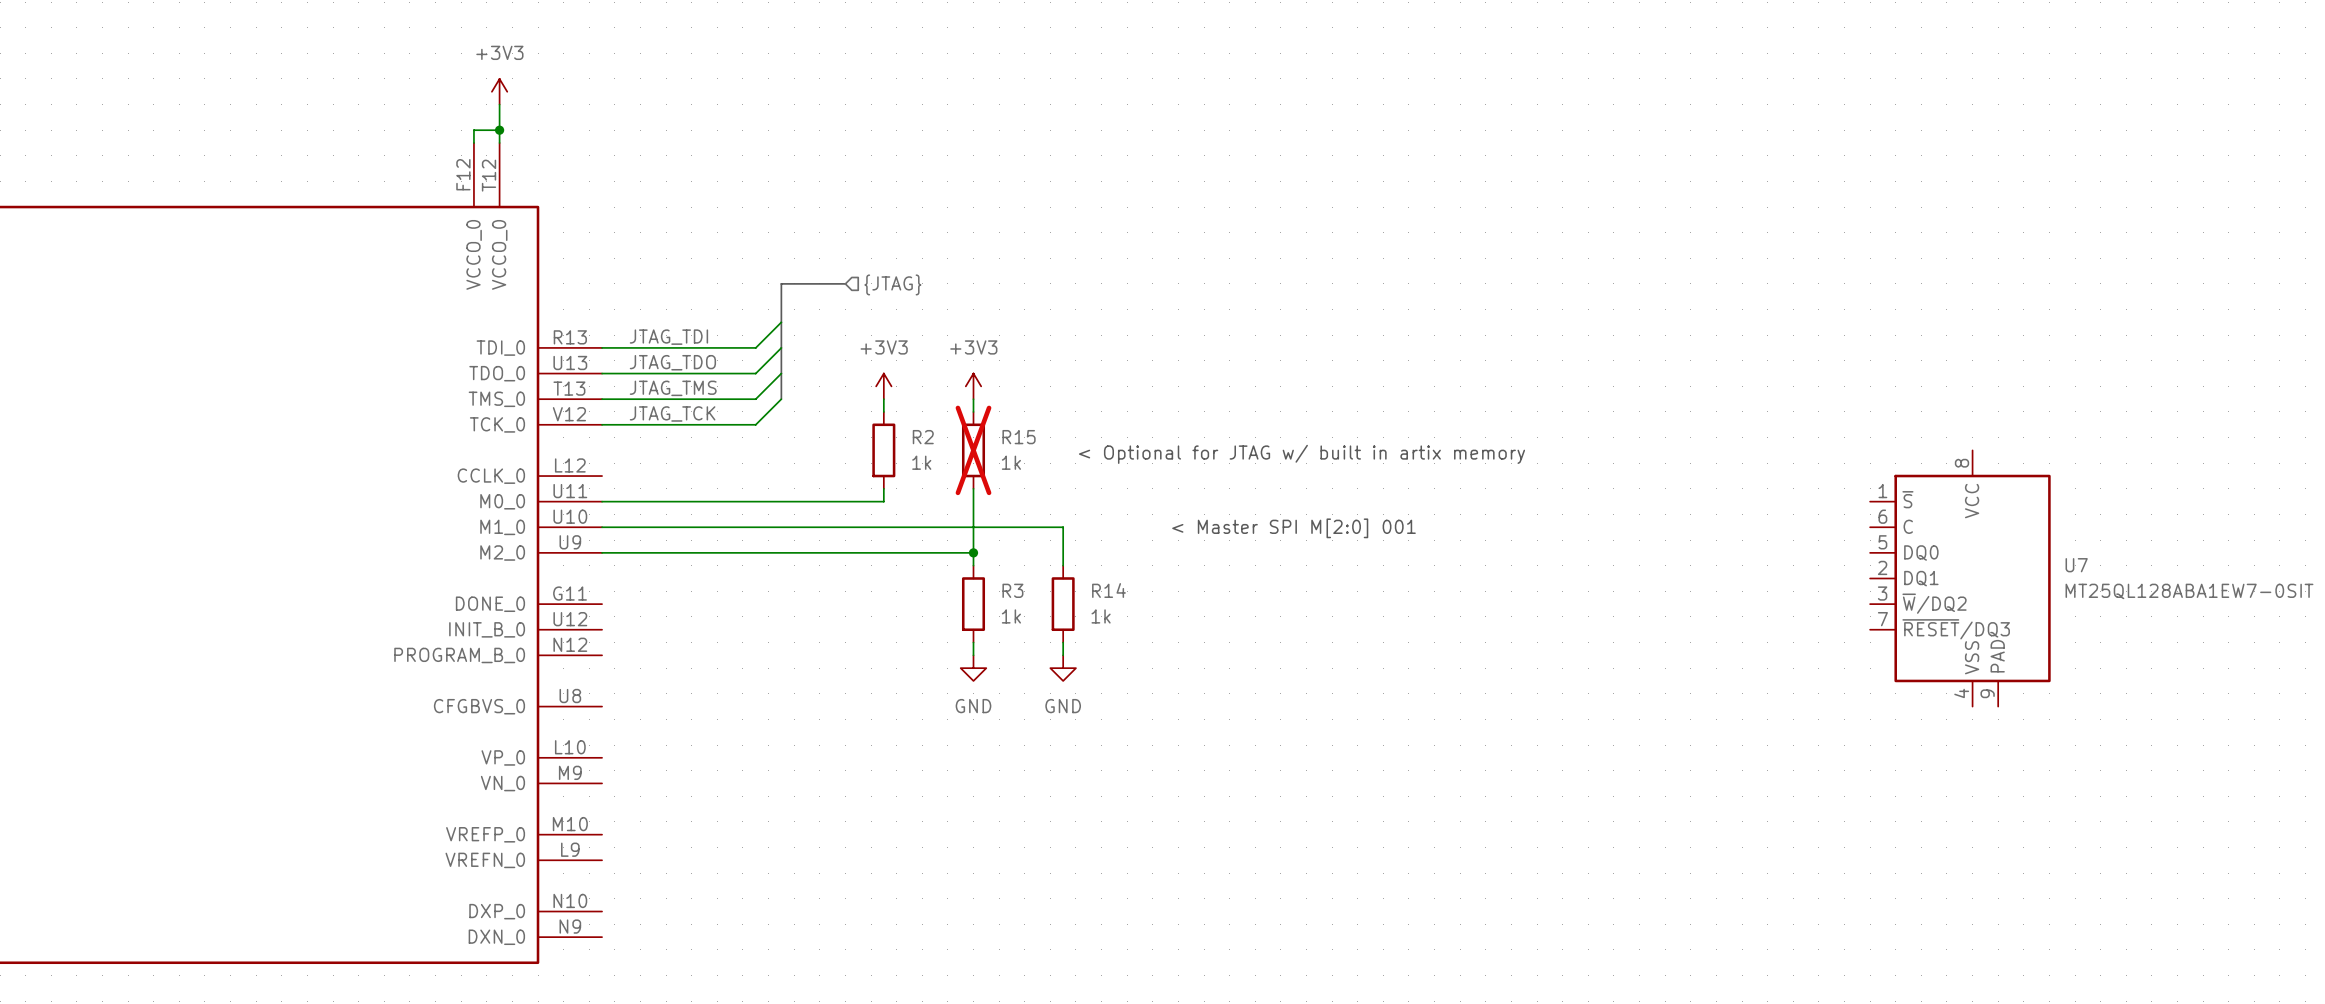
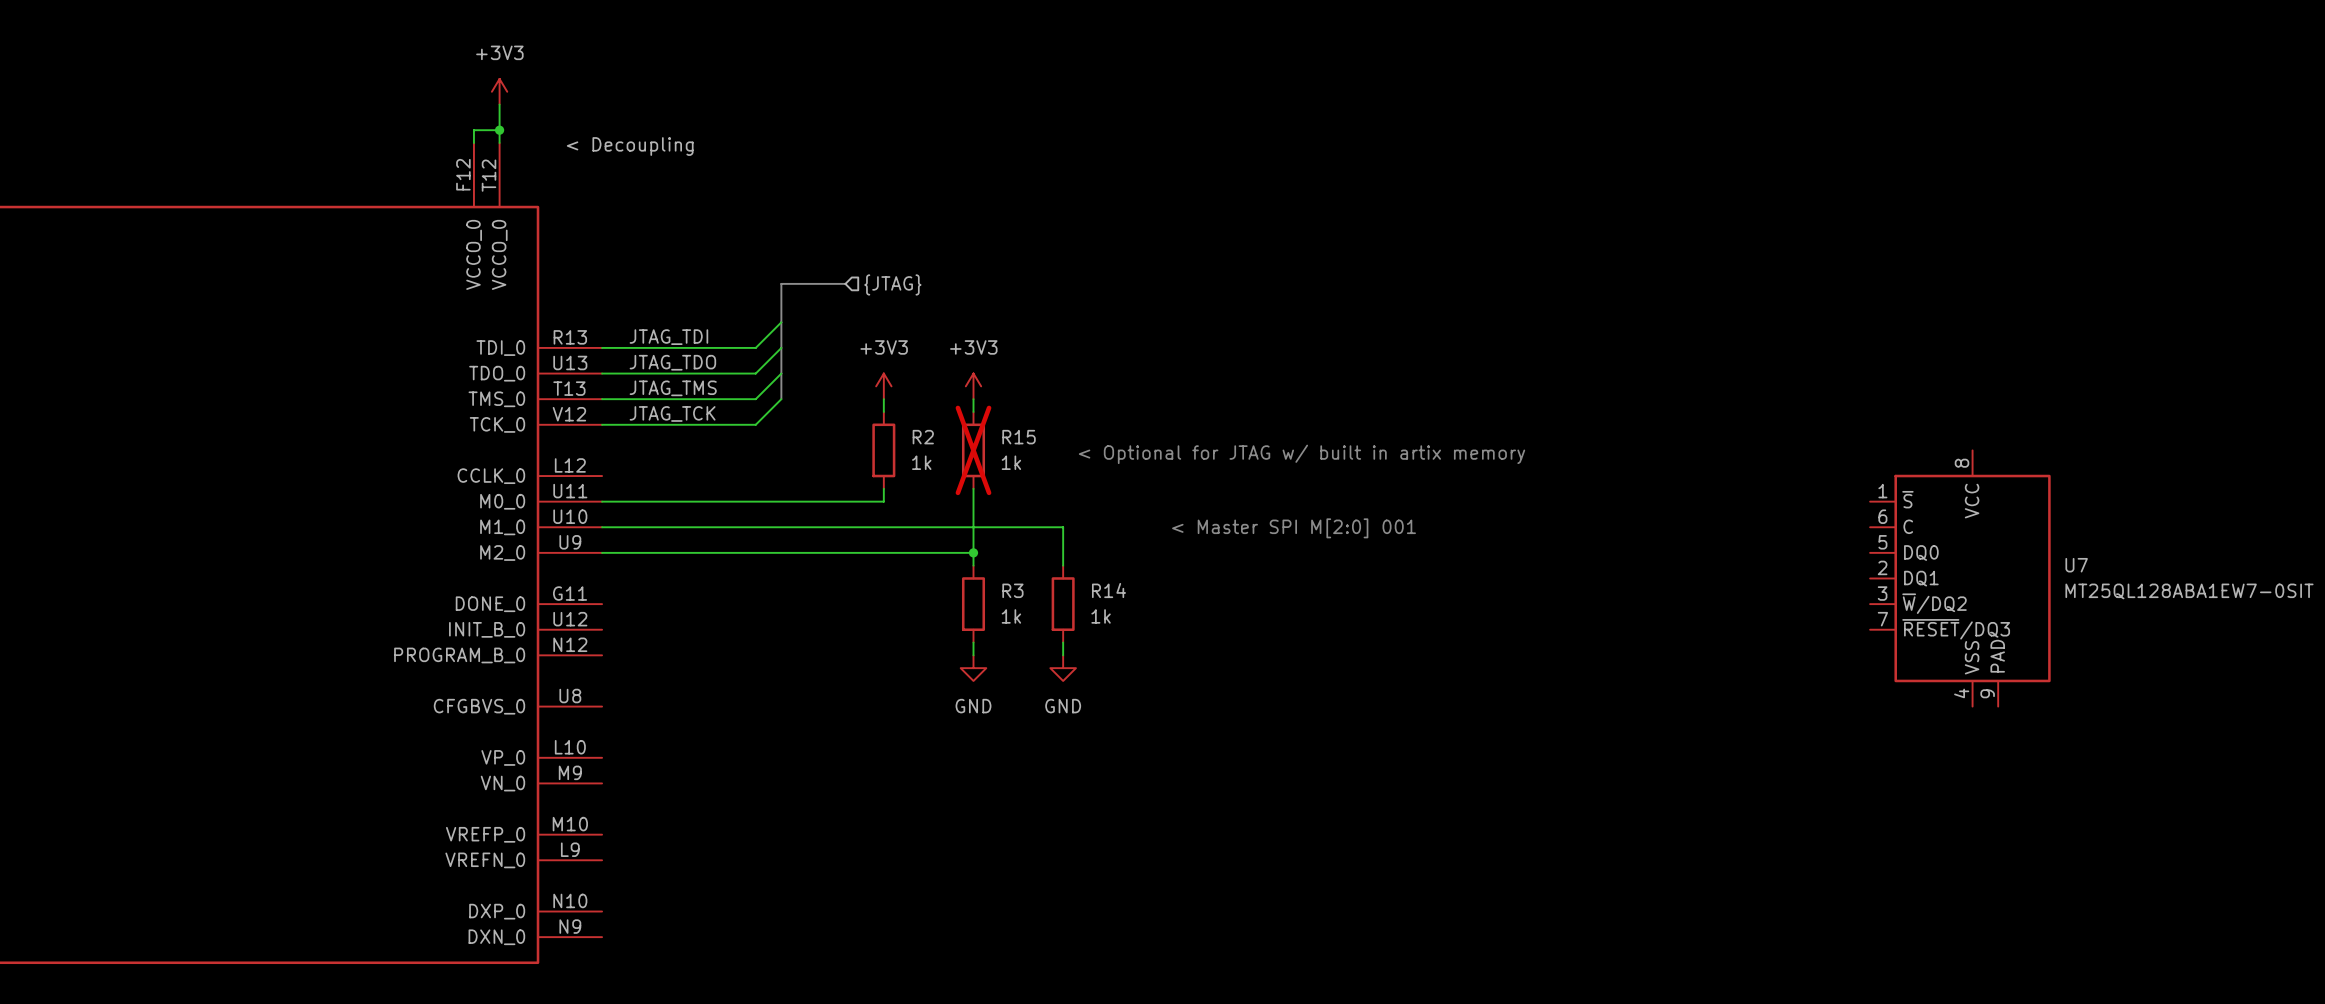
label: none -> < Decoupling (630, 146)

